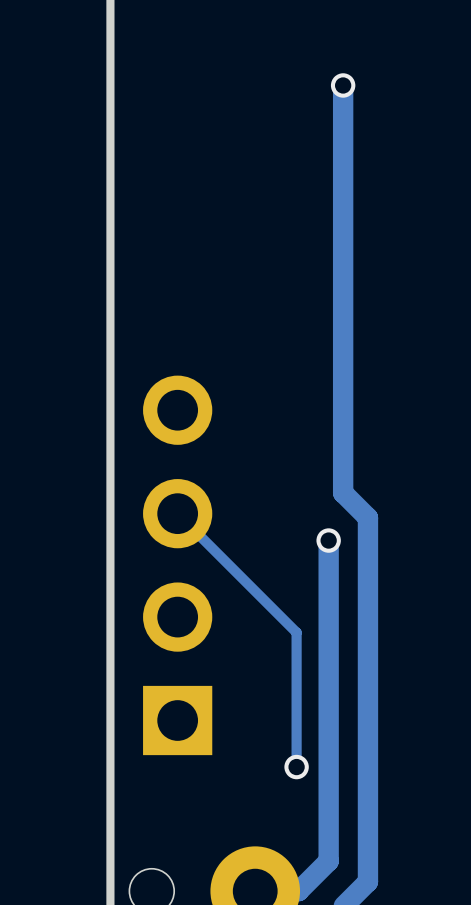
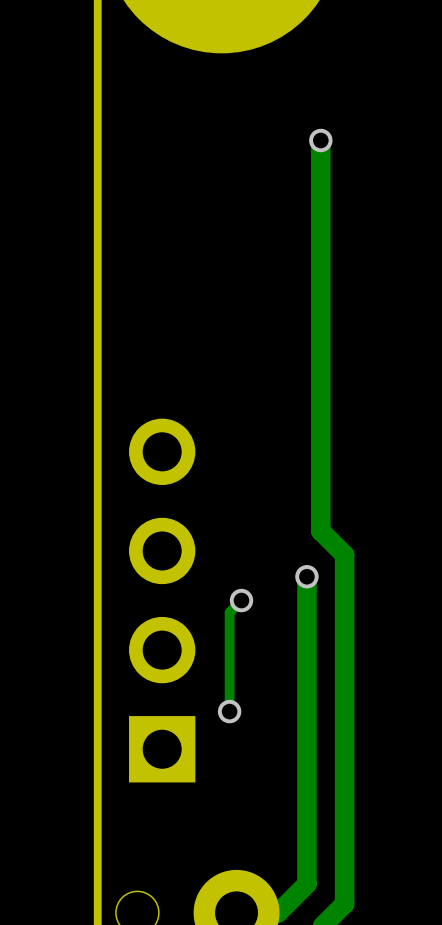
track: (177, 513) (296, 632) (296, 767) -> none
track: none -> (241, 600) (229, 612) (229, 711)
via: none -> (241, 600)
via position: (296, 767) -> (229, 711)

